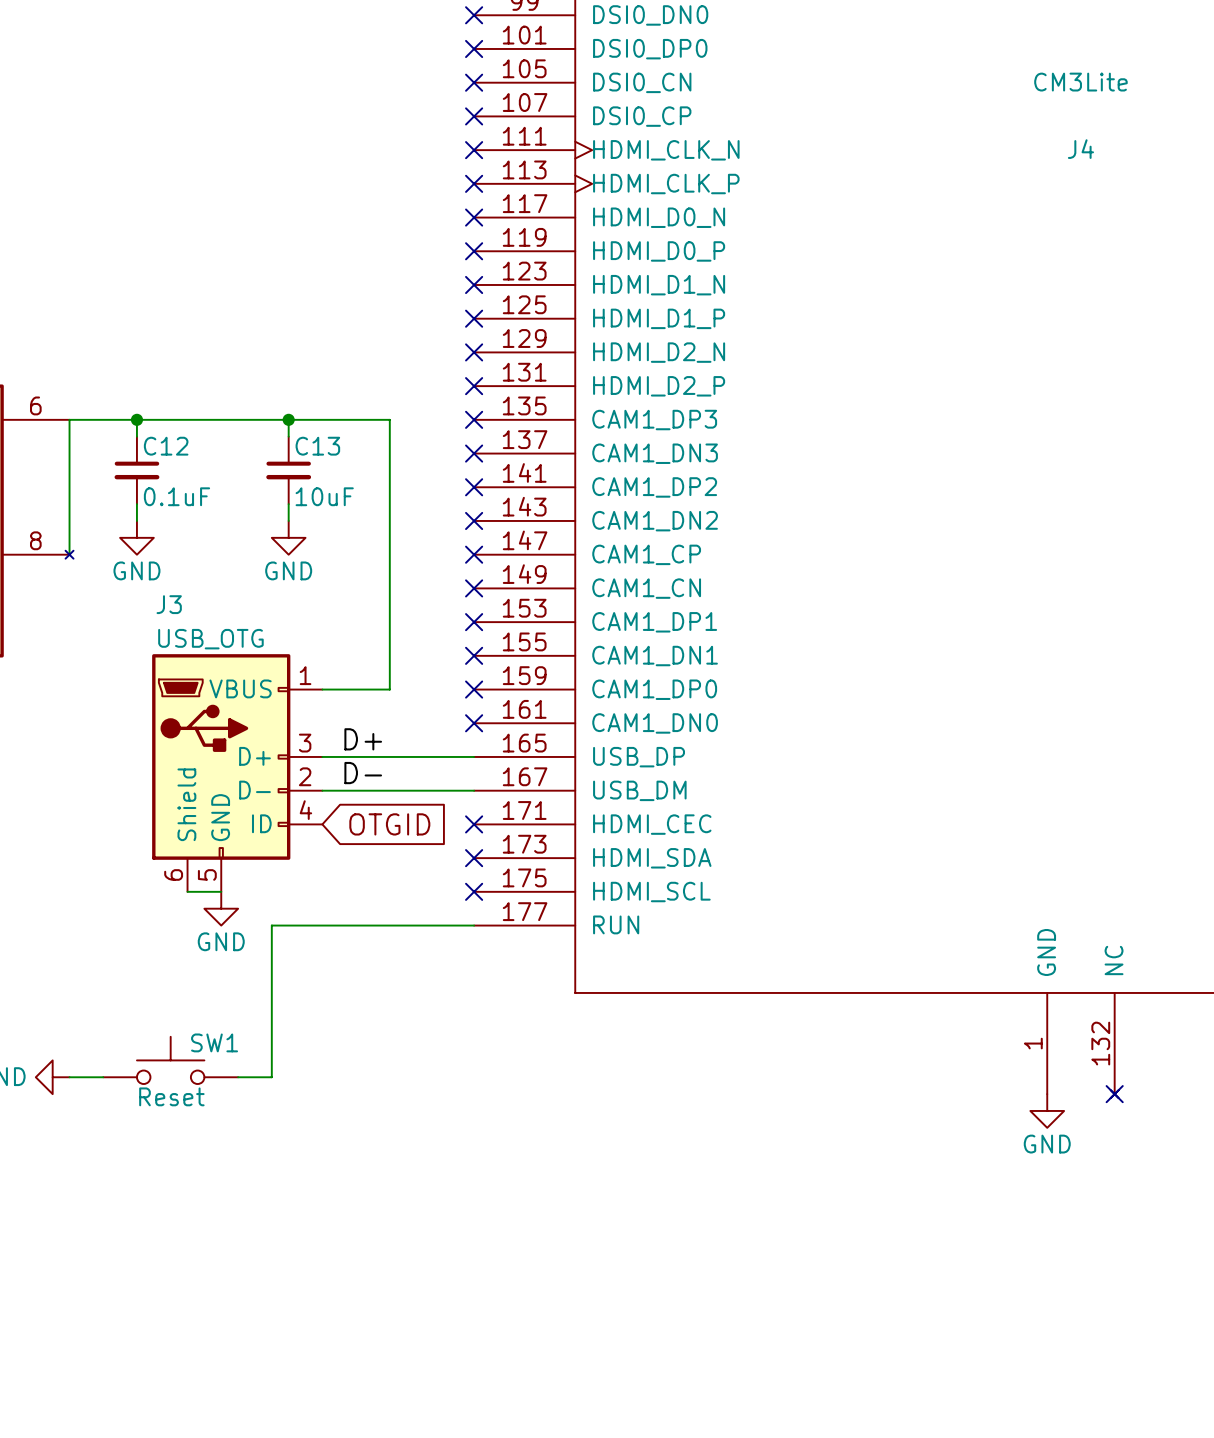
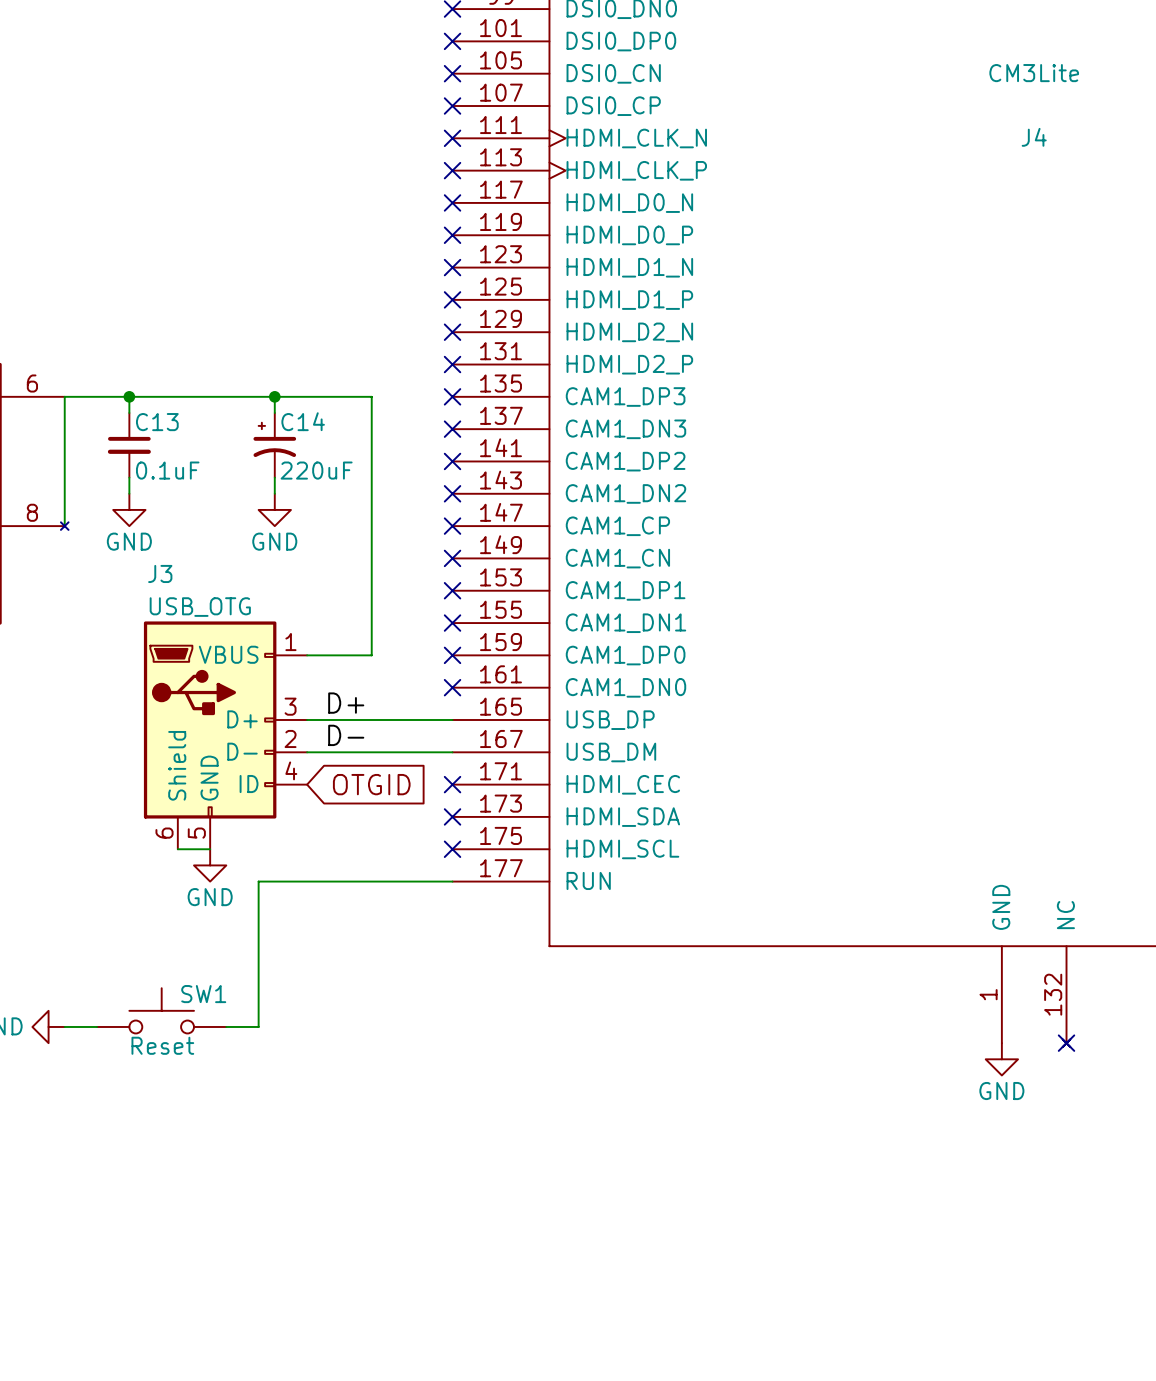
C12 name: C12 (166, 446) -> C13 (157, 422)
C13: 10uF (288, 470) -> none
C14: none -> 220uF (274, 445)

